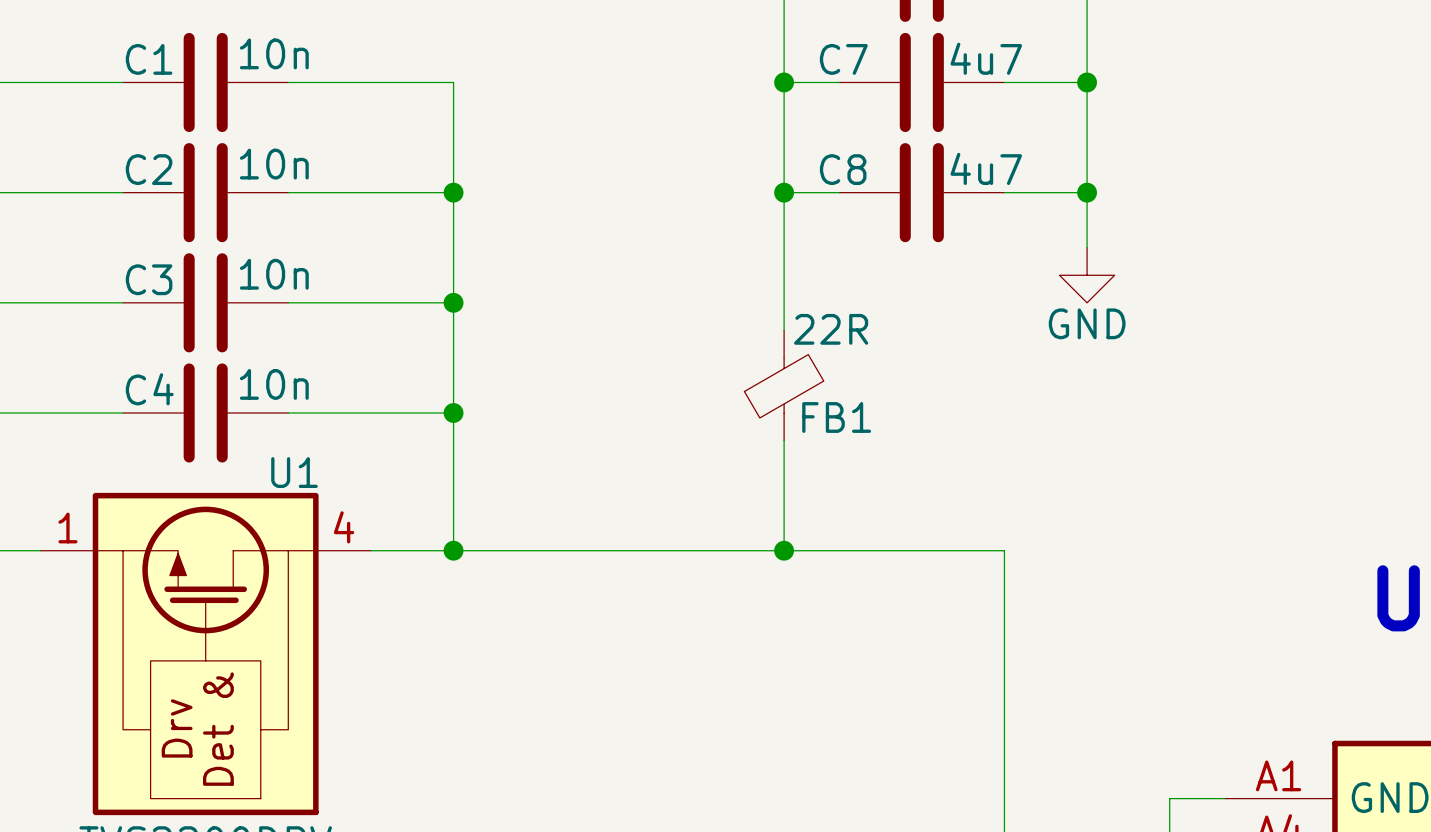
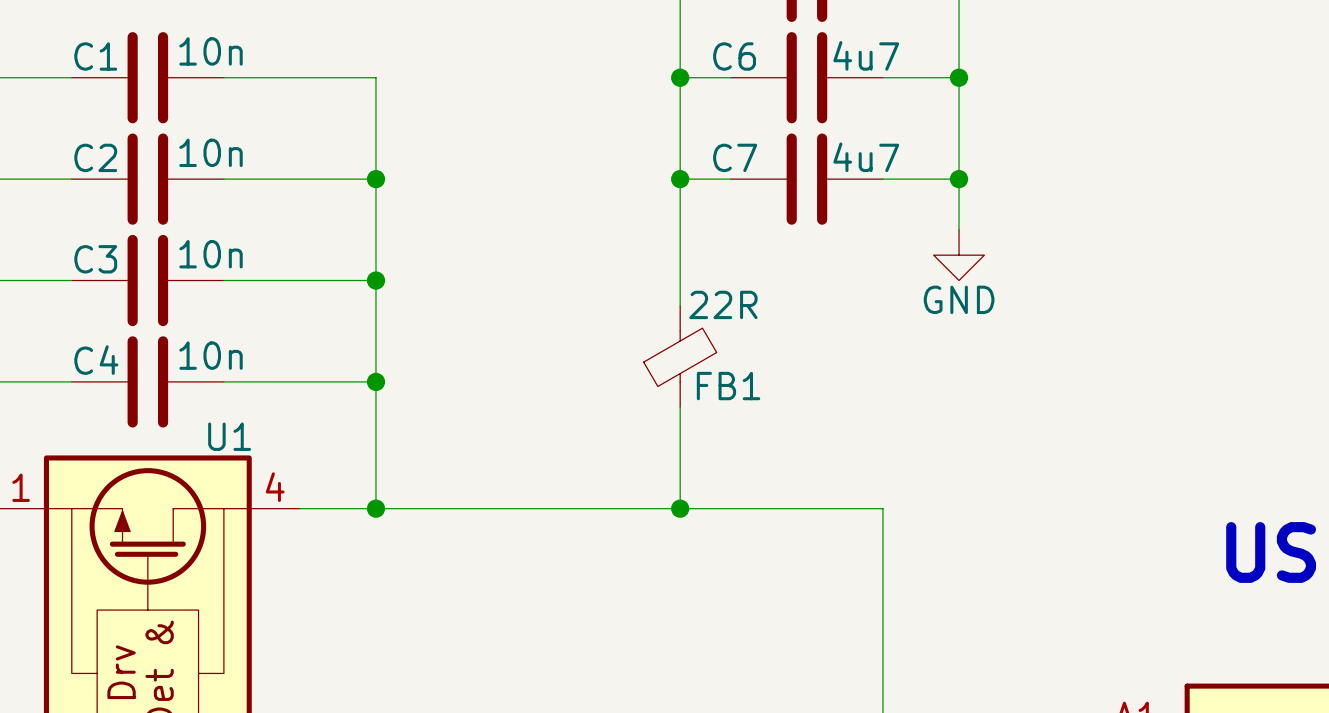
C7 name: C7 (843, 59) -> C6 (734, 56)
C8 name: C8 (843, 169) -> C7 (735, 157)

